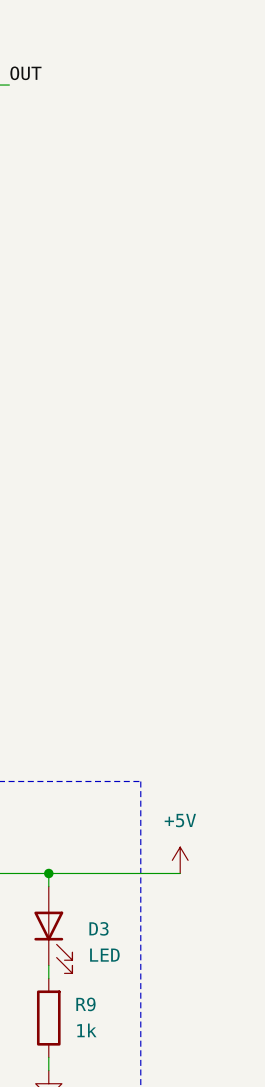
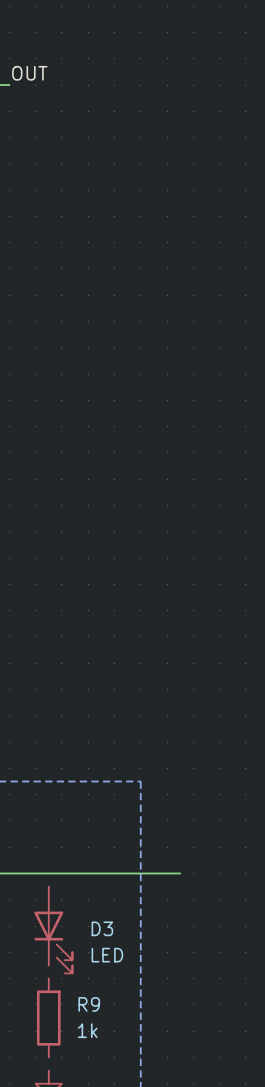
power symbol: +5V (180, 860) -> none
wire: (48, 873) (48, 886) -> none
junction: (48, 873) -> none
wire: (48, 965) (48, 978) -> none
wire: (48, 1057) (48, 1070) -> none

